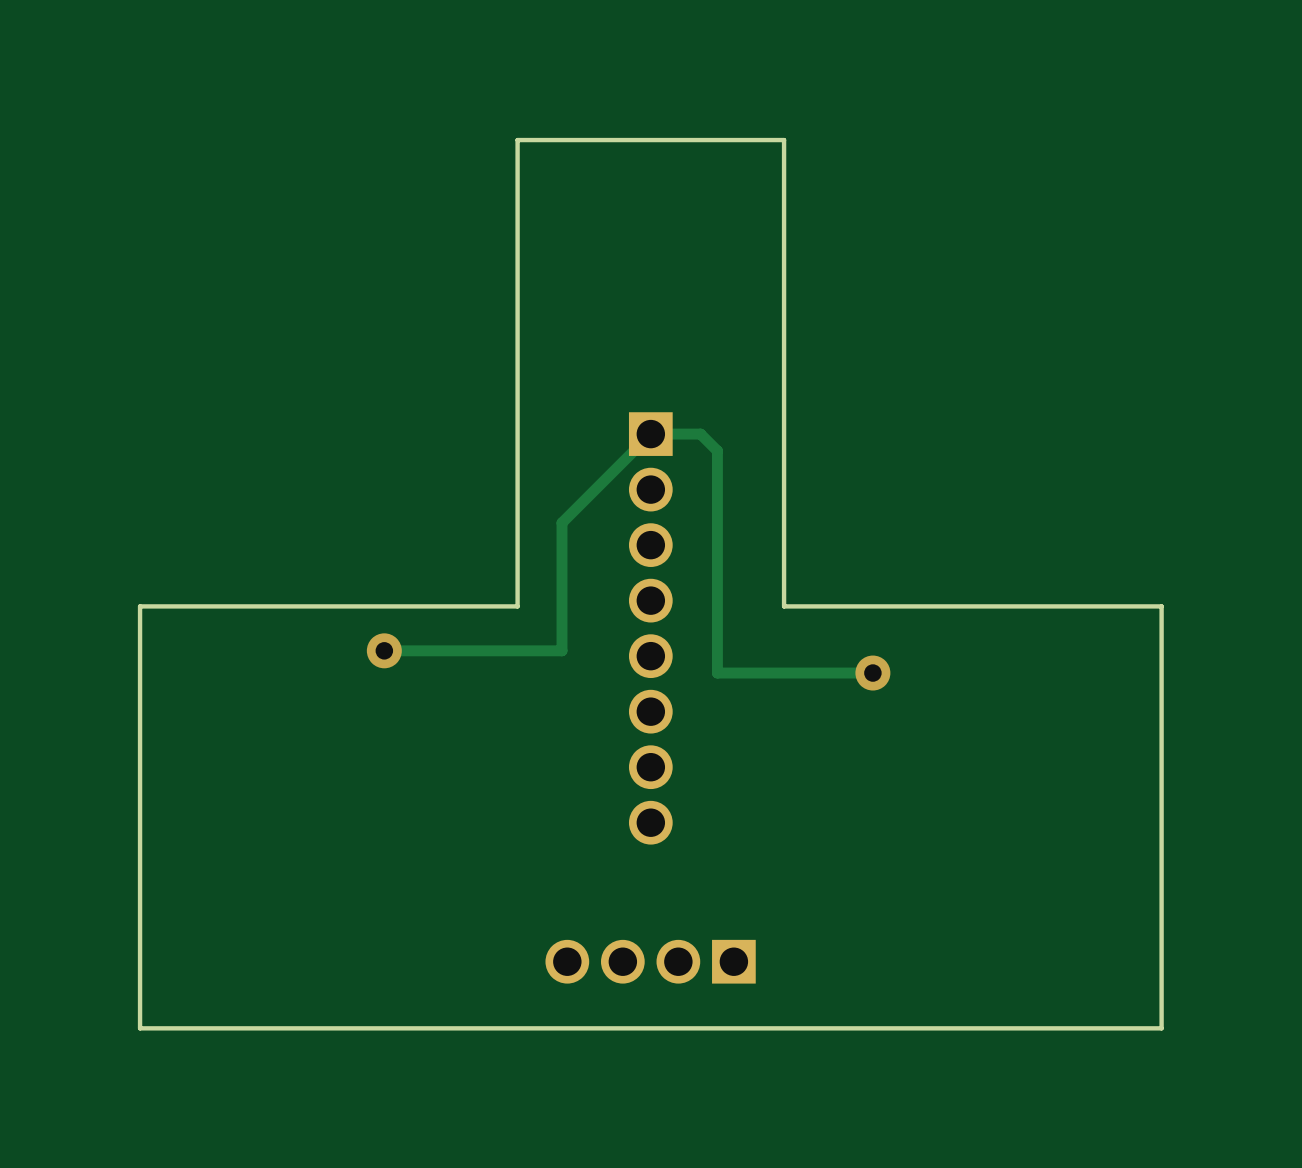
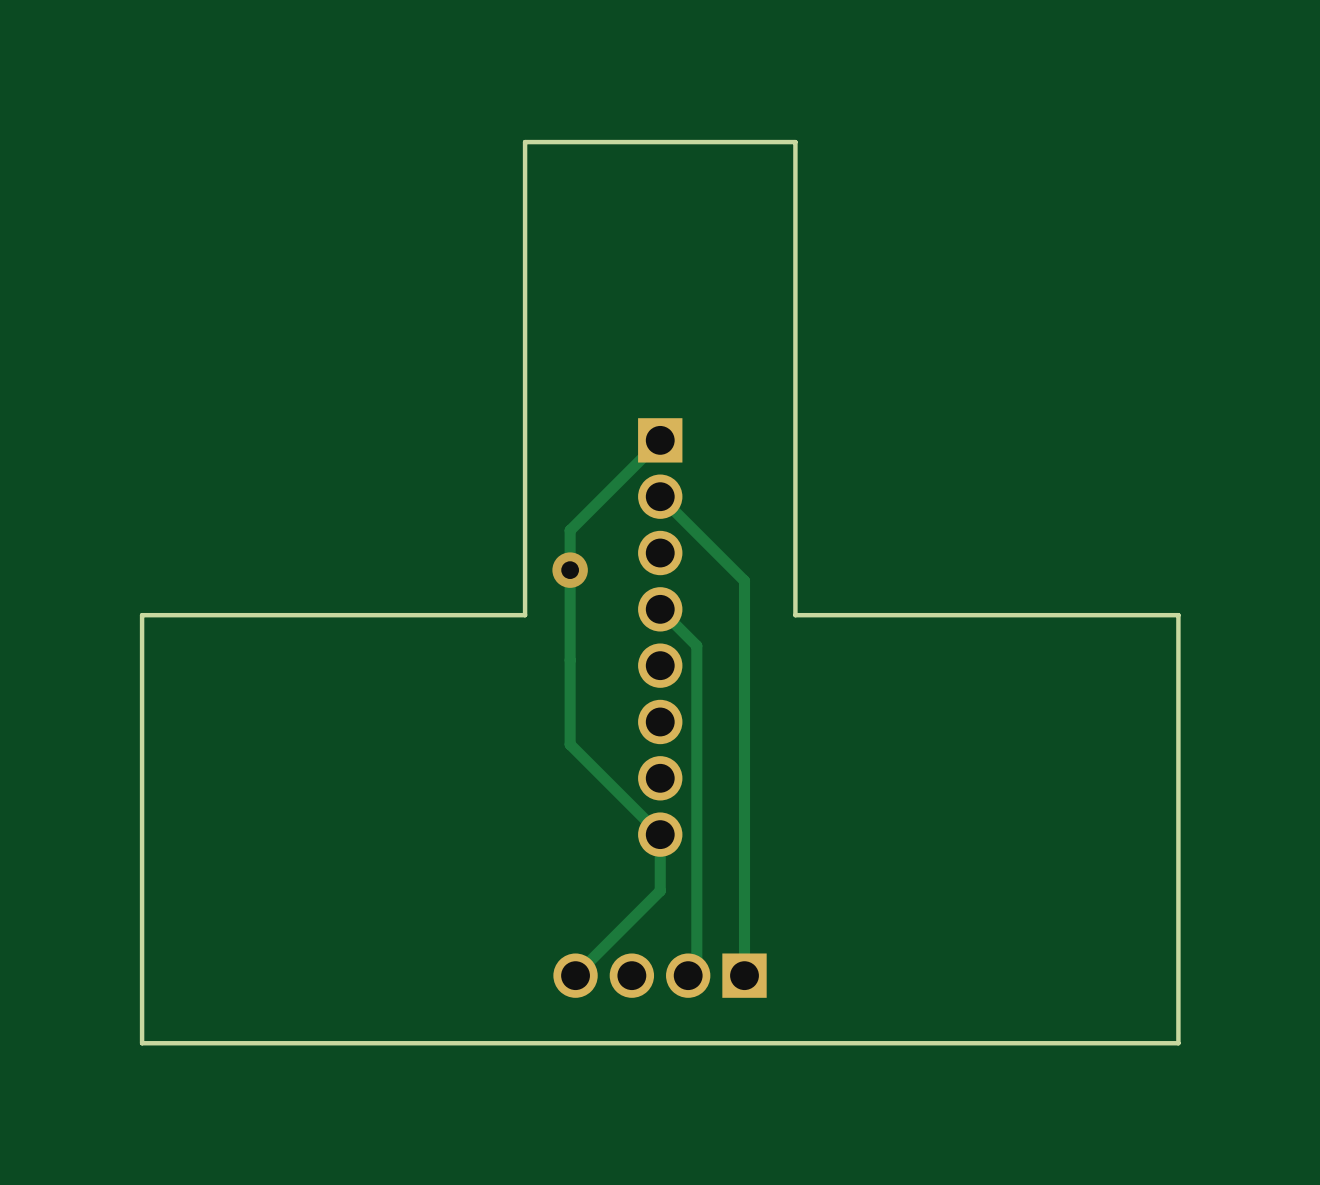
track: (650, 434) (700, 434) (717, 450) (717, 673) (872, 673) -> none
track: none -> (660, 496) (744, 580) (744, 975)
via: none -> (570, 570)
track: none -> (660, 609) (696, 645) (696, 967) (688, 975)
via: (384, 650) -> none
track: (561, 650) (384, 650) -> (570, 660) (570, 744) (660, 834) (660, 890) (575, 975)
via: (872, 673) -> none

